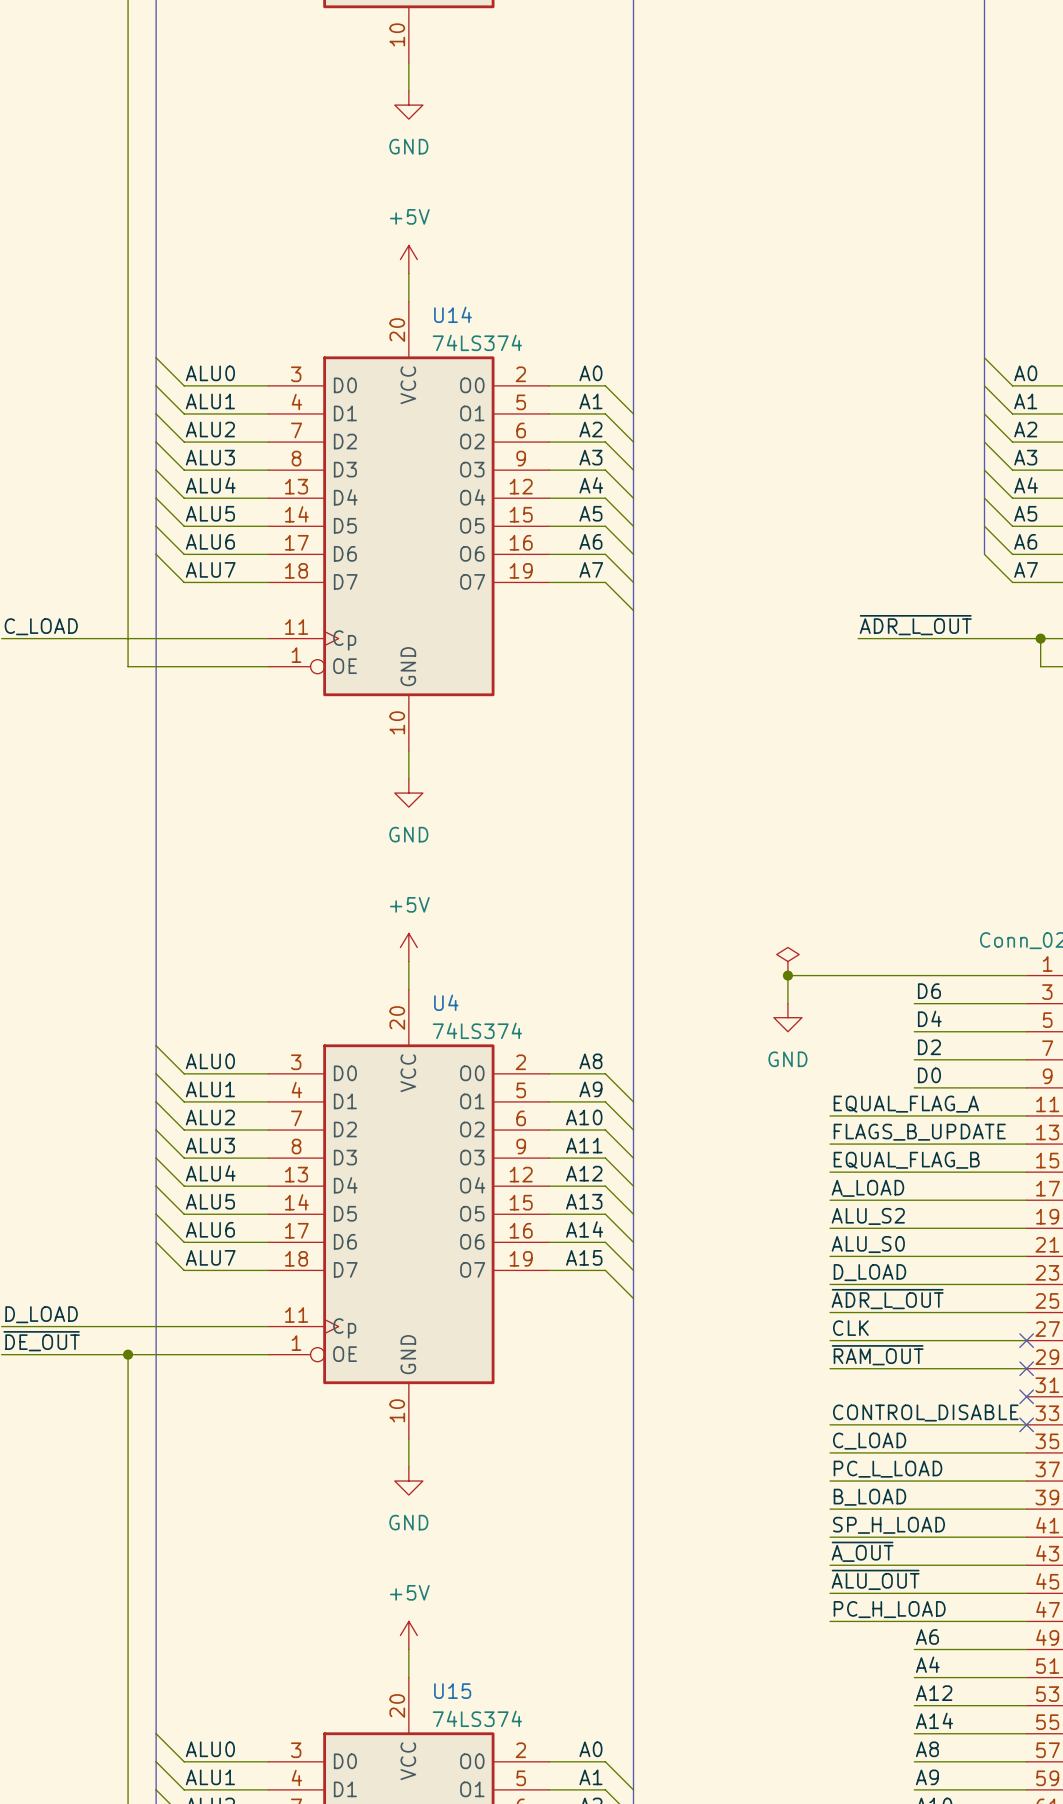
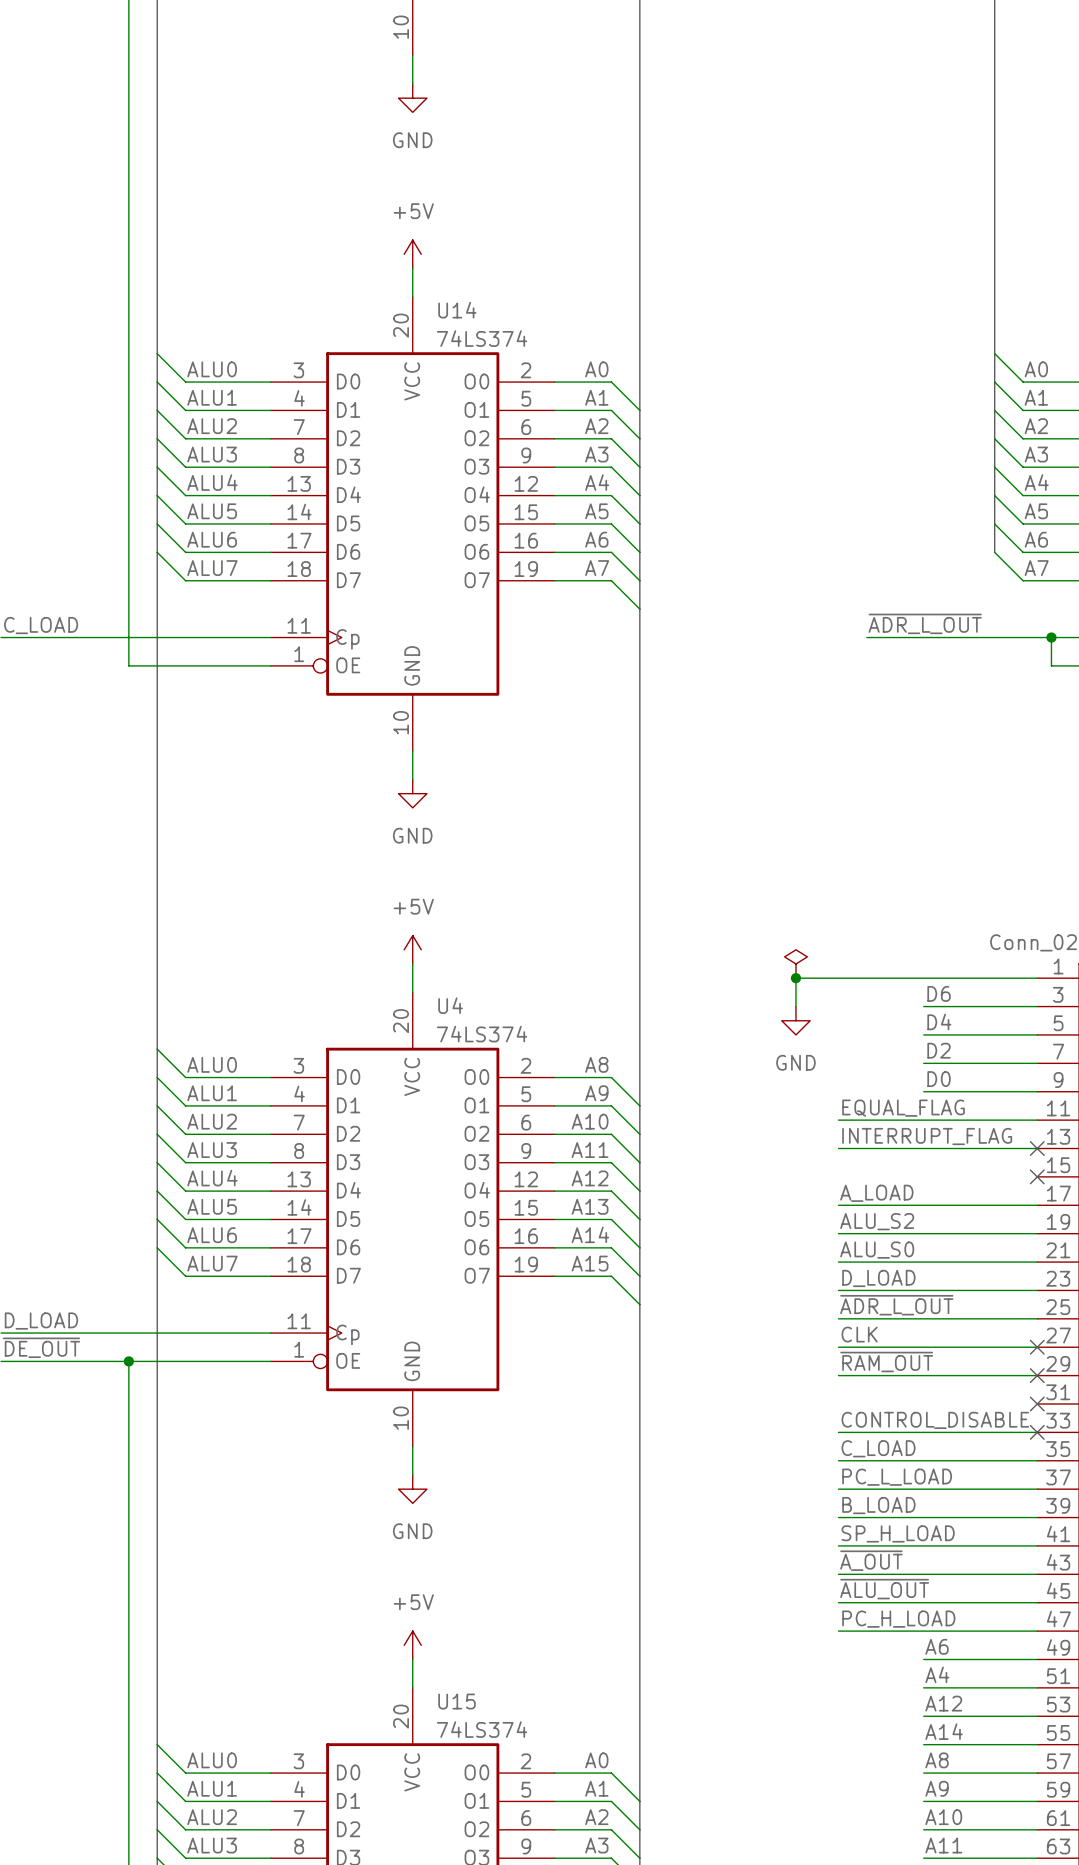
label: EQUAL_FLAG_A (906, 1104) -> EQUAL_FLAG (903, 1108)
label: FLAGS_B_UPDATE (919, 1132) -> INTERRUPT_FLAG (927, 1136)
no-connect mark: none -> (1037, 1148)
label: EQUAL_FLAG_B (906, 1160) -> none
wire: (830, 1172) (1026, 1172) -> none
no-connect mark: none -> (1037, 1176)

